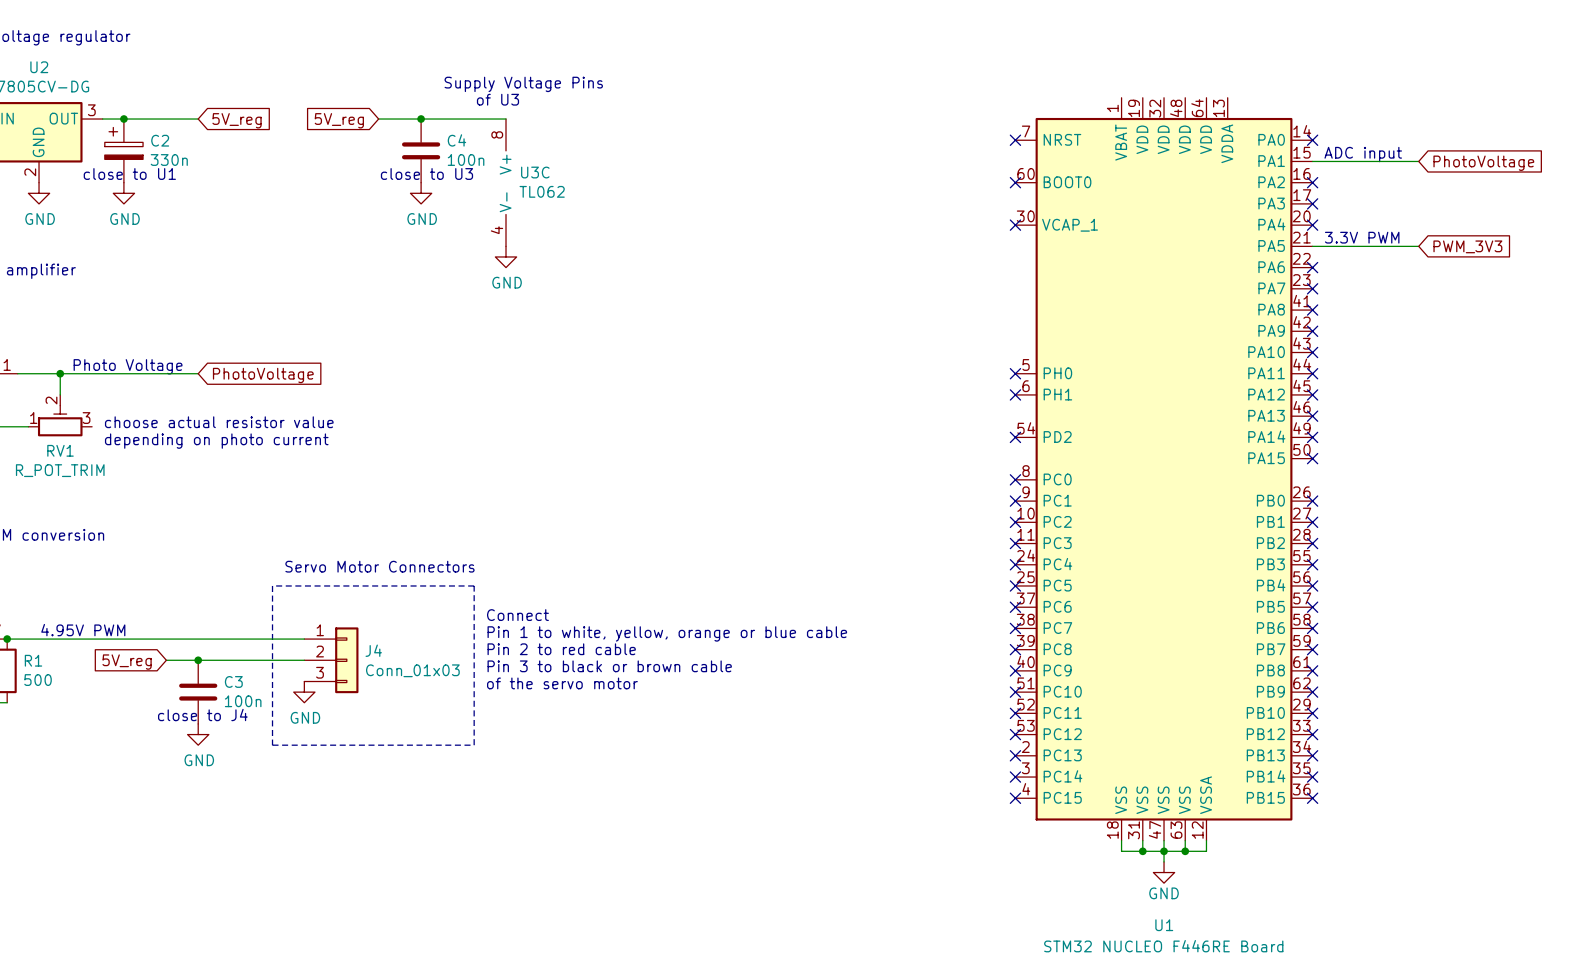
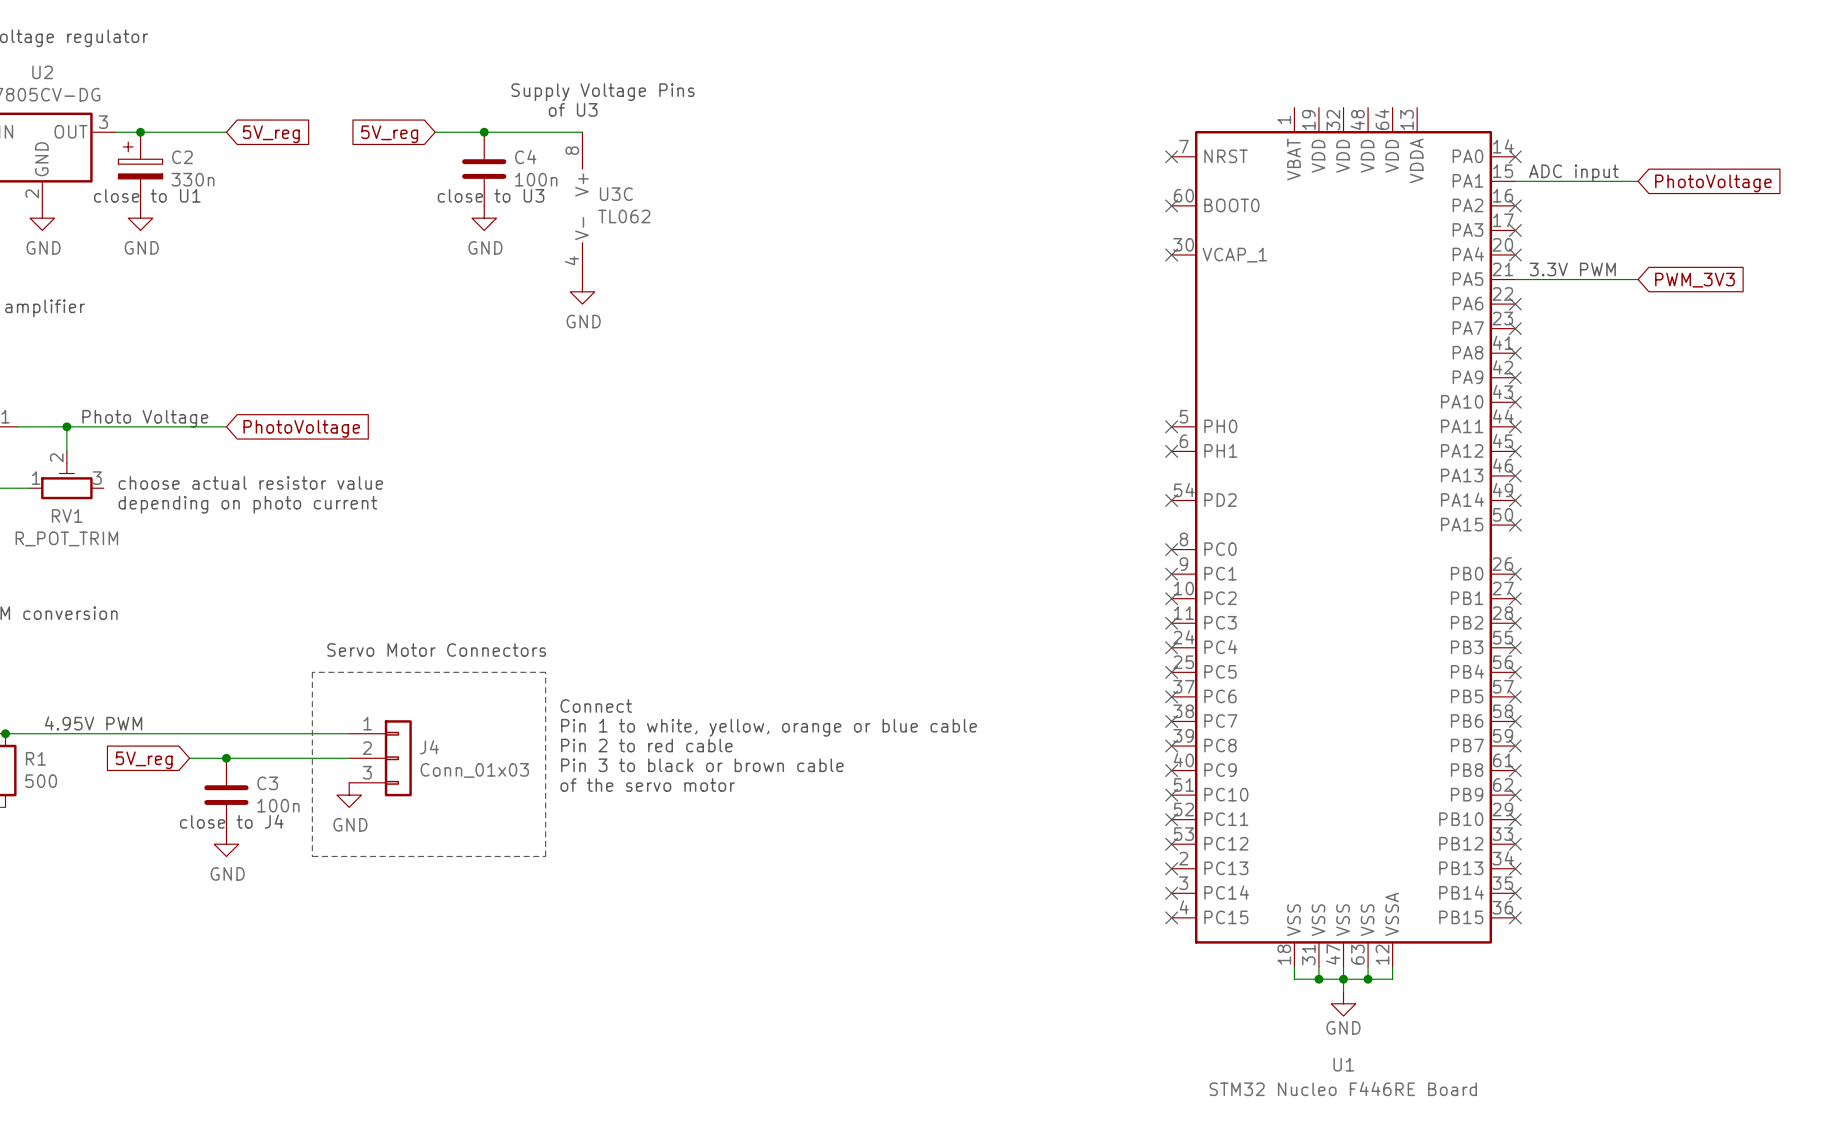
U1 value: STM32 NUCLEO F446RE Board (1163, 946) -> STM32 Nucleo F446RE Board (1343, 1088)

